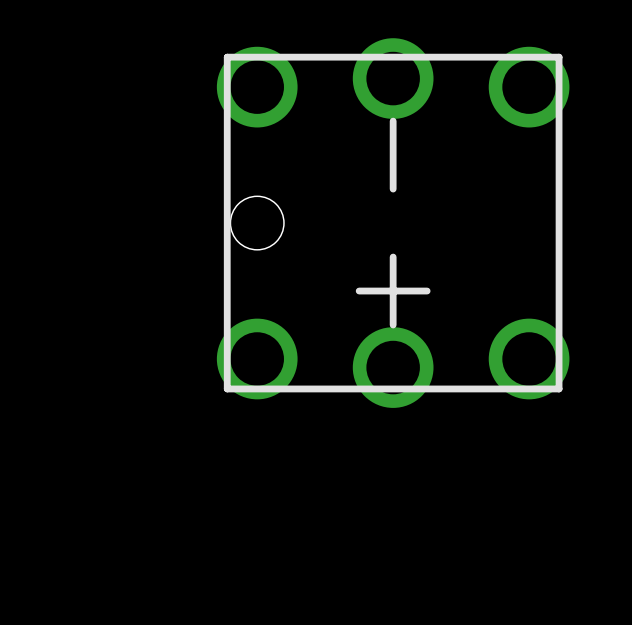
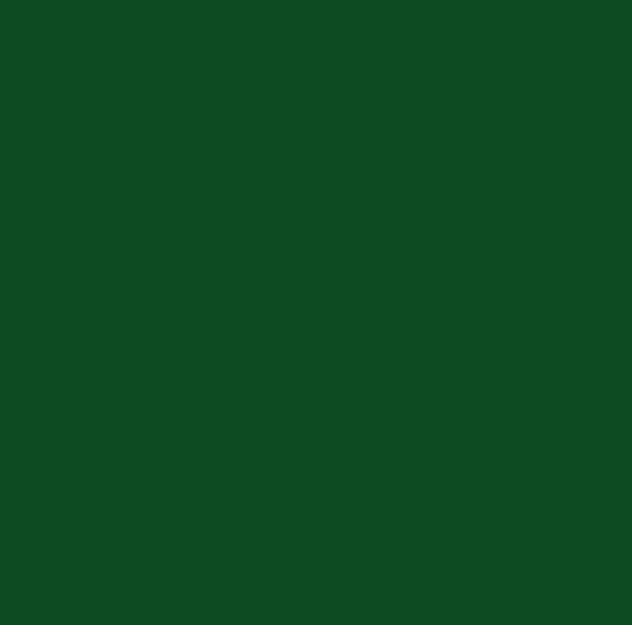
part: (393, 223) -> none

